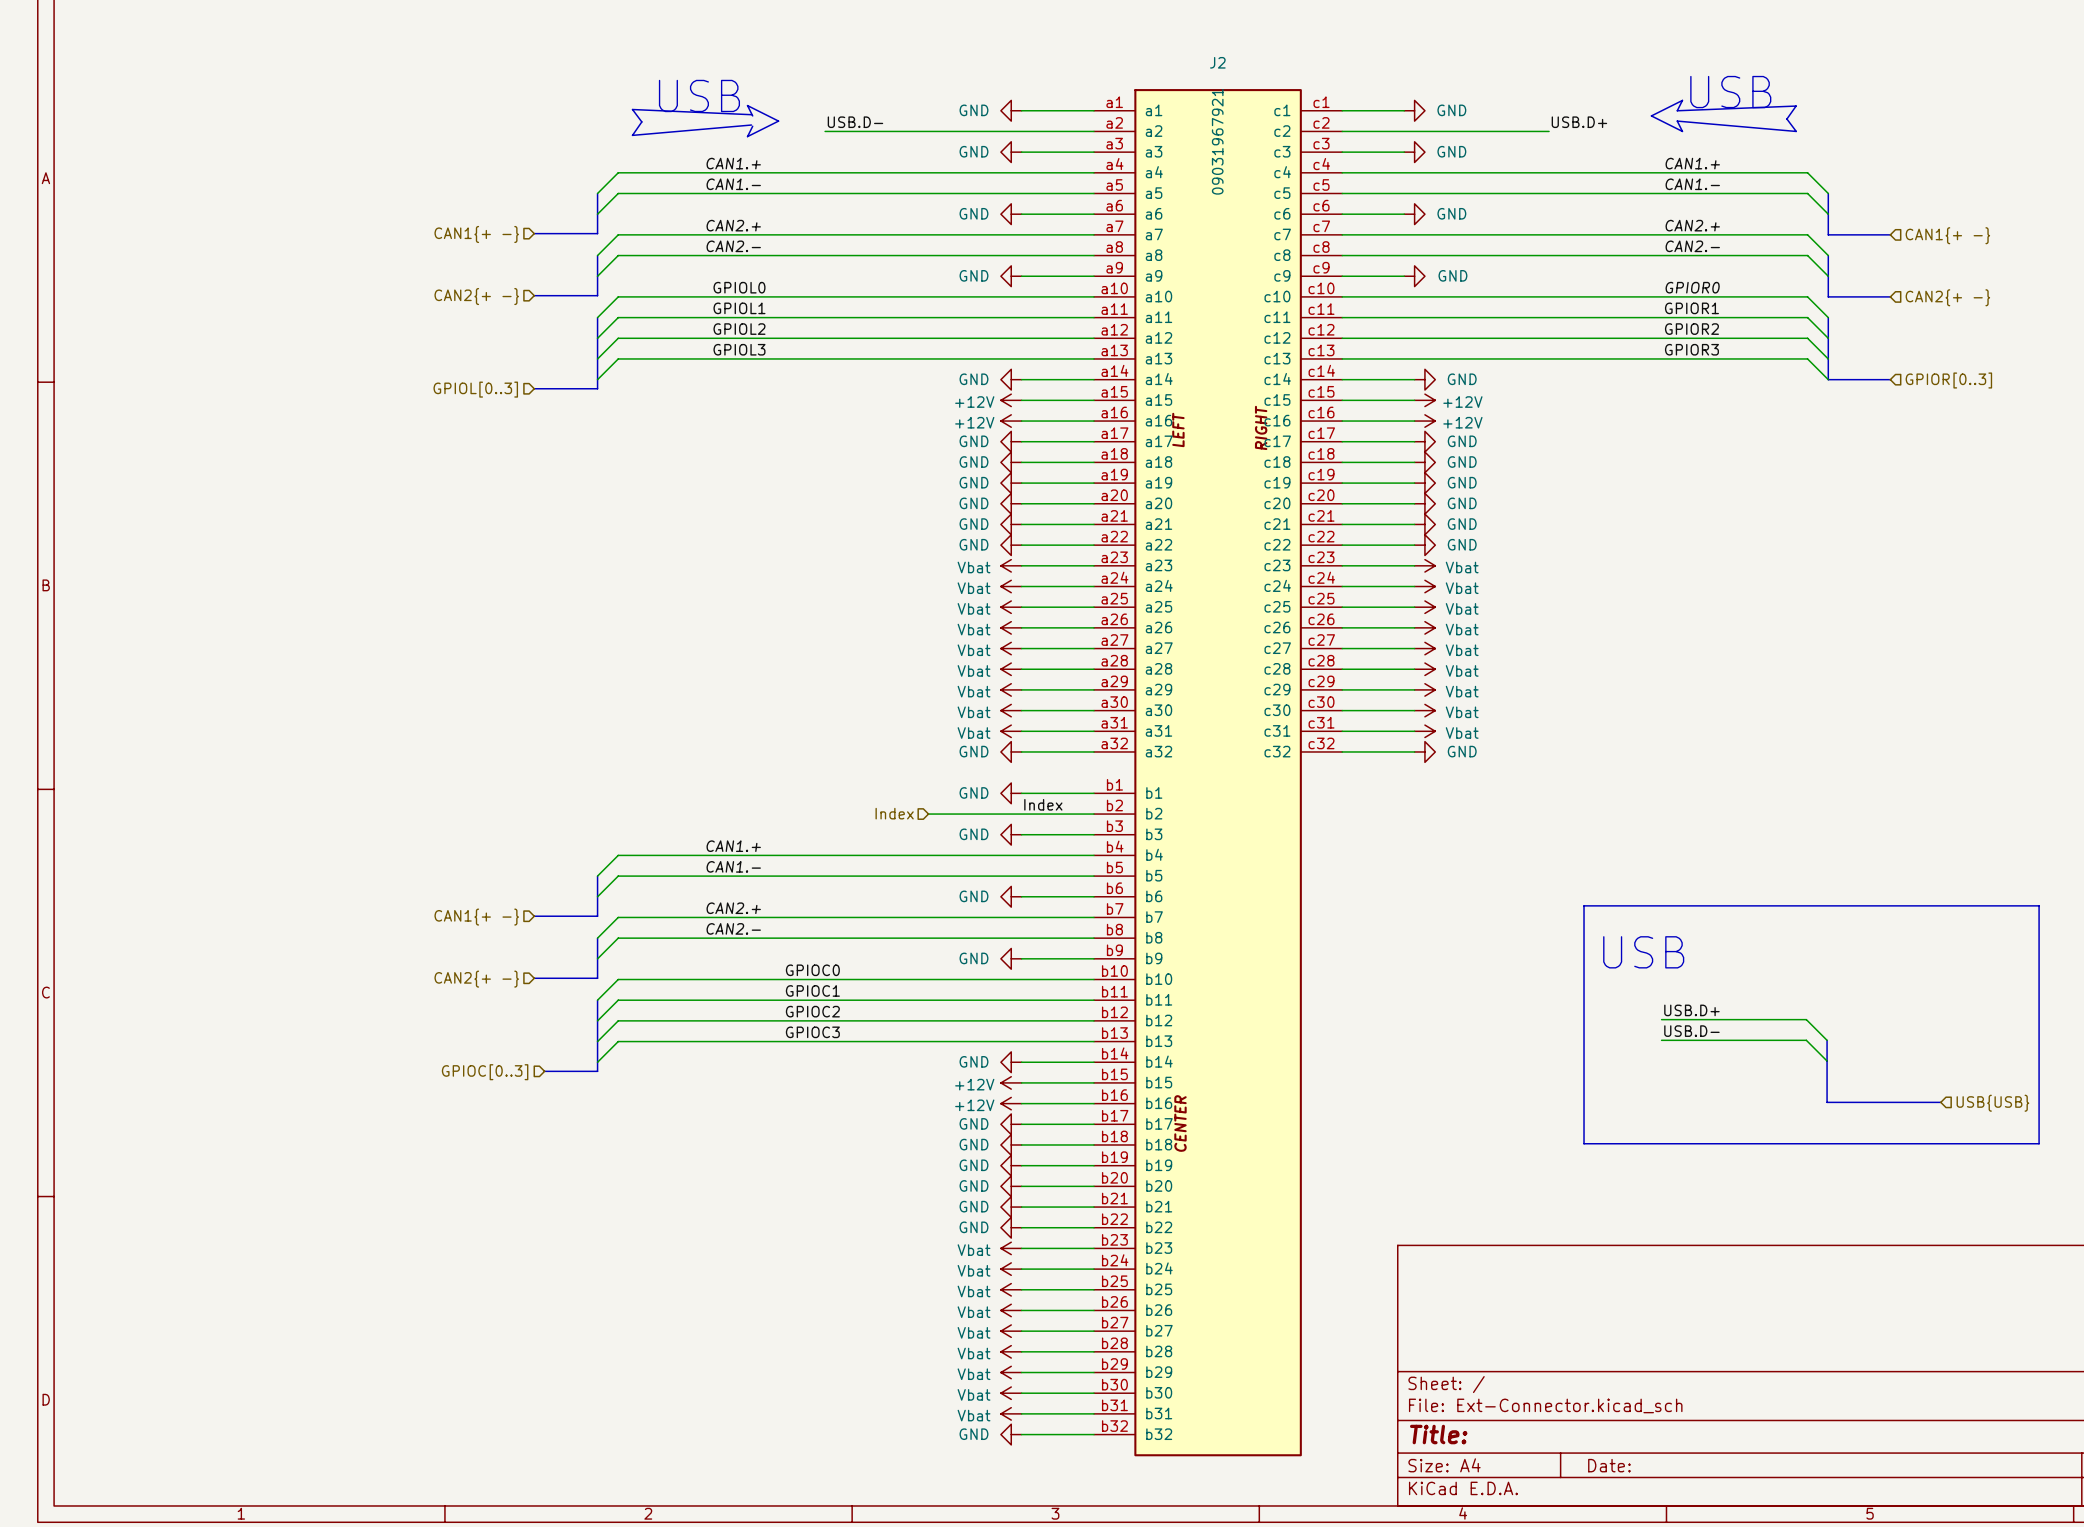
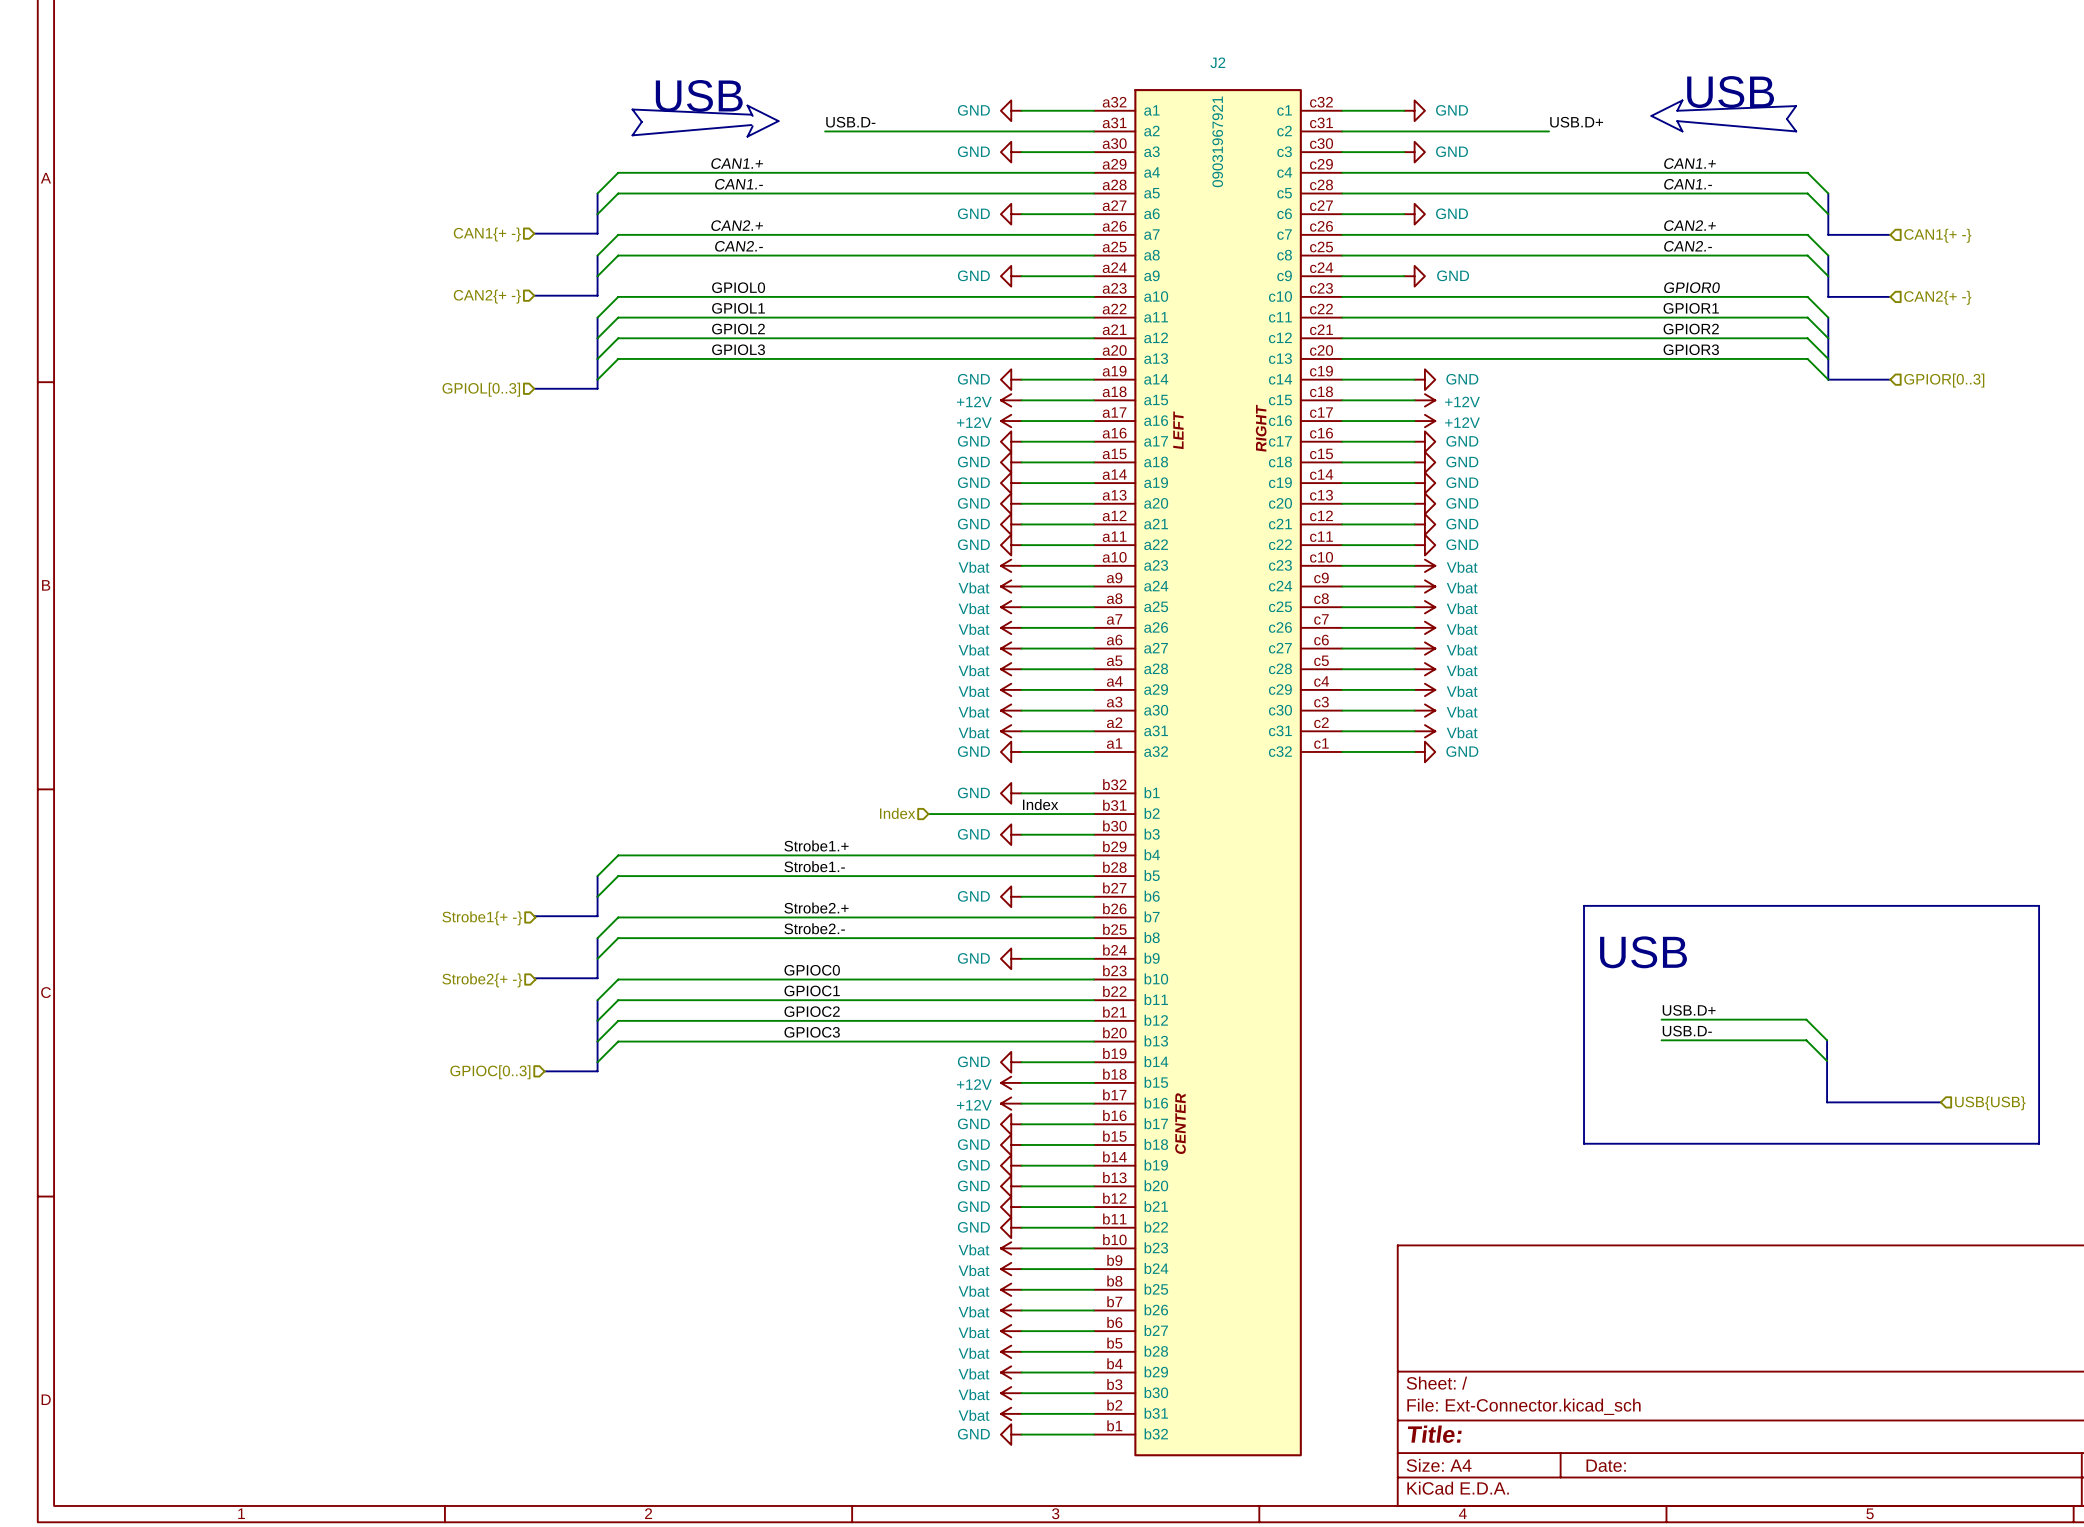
J2 symbol: [1093, 89, 1343, 1457] -> [1093, 89, 1343, 1457]
label: CAN1.+ (733, 846) -> none
label: none -> Strobe1.+ (816, 845)
label: CAN1.- (733, 866) -> none
label: none -> Strobe1.- (814, 866)
label: CAN2.+ (733, 908) -> none
label: none -> Strobe2.+ (816, 908)
hierarchical label: CAN1{+ -} (476, 917) -> Strobe1{+ -} (482, 918)
label: CAN2.- (733, 928) -> none
label: none -> Strobe2.- (814, 928)
hierarchical label: CAN2{+ -} (476, 979) -> Strobe2{+ -} (482, 980)

